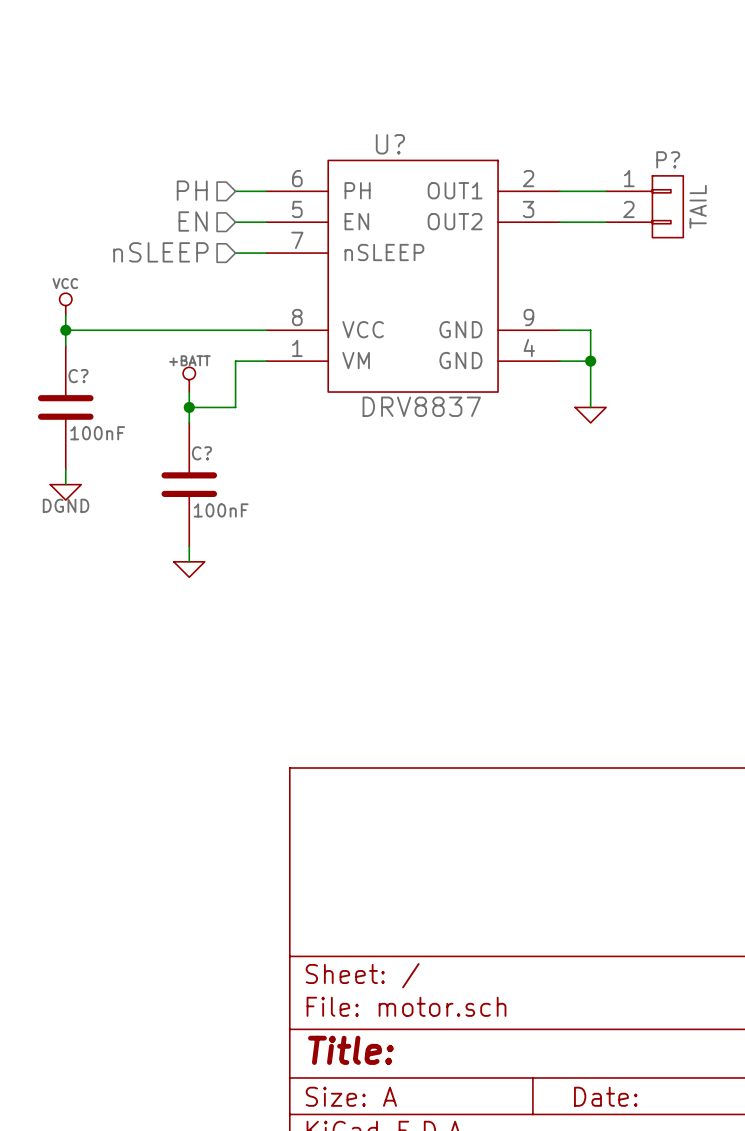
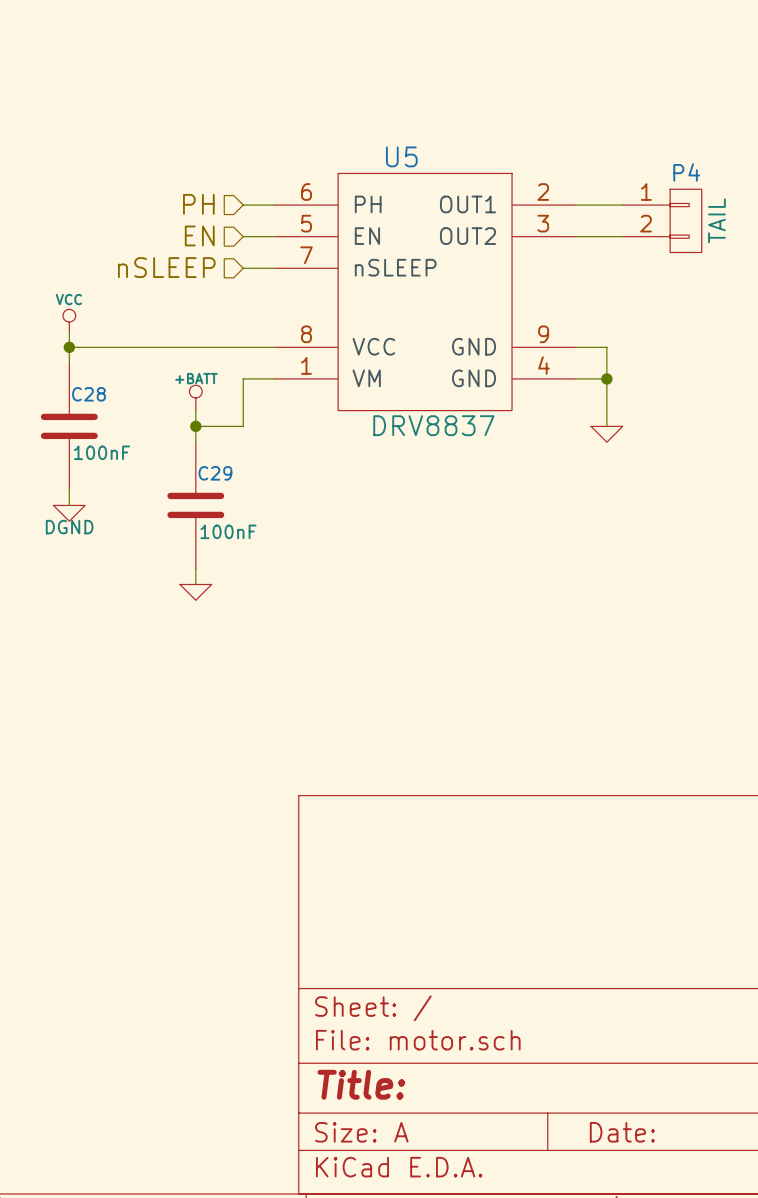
U? name: U? (390, 144) -> U5 (401, 156)
P? name: P? (668, 159) -> P4 (686, 172)
C? name: C? (78, 376) -> C28 (88, 394)
C? name: C? (201, 453) -> C29 (215, 473)

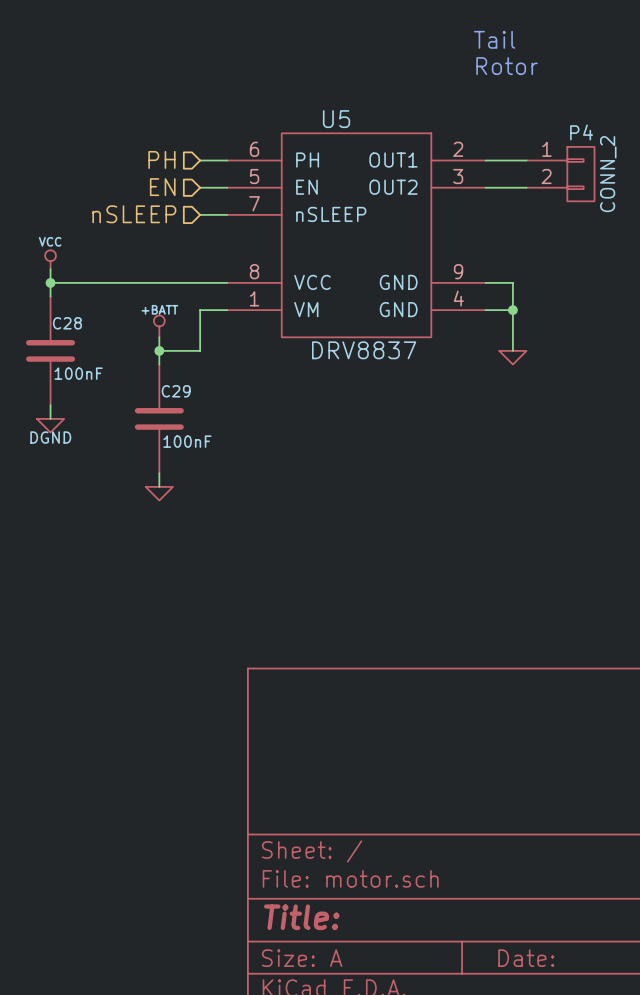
text: none -> Tail (494, 39)
text: none -> Rotor (507, 66)
P4 value: TAIL (716, 220) -> CONN_2 (608, 174)

